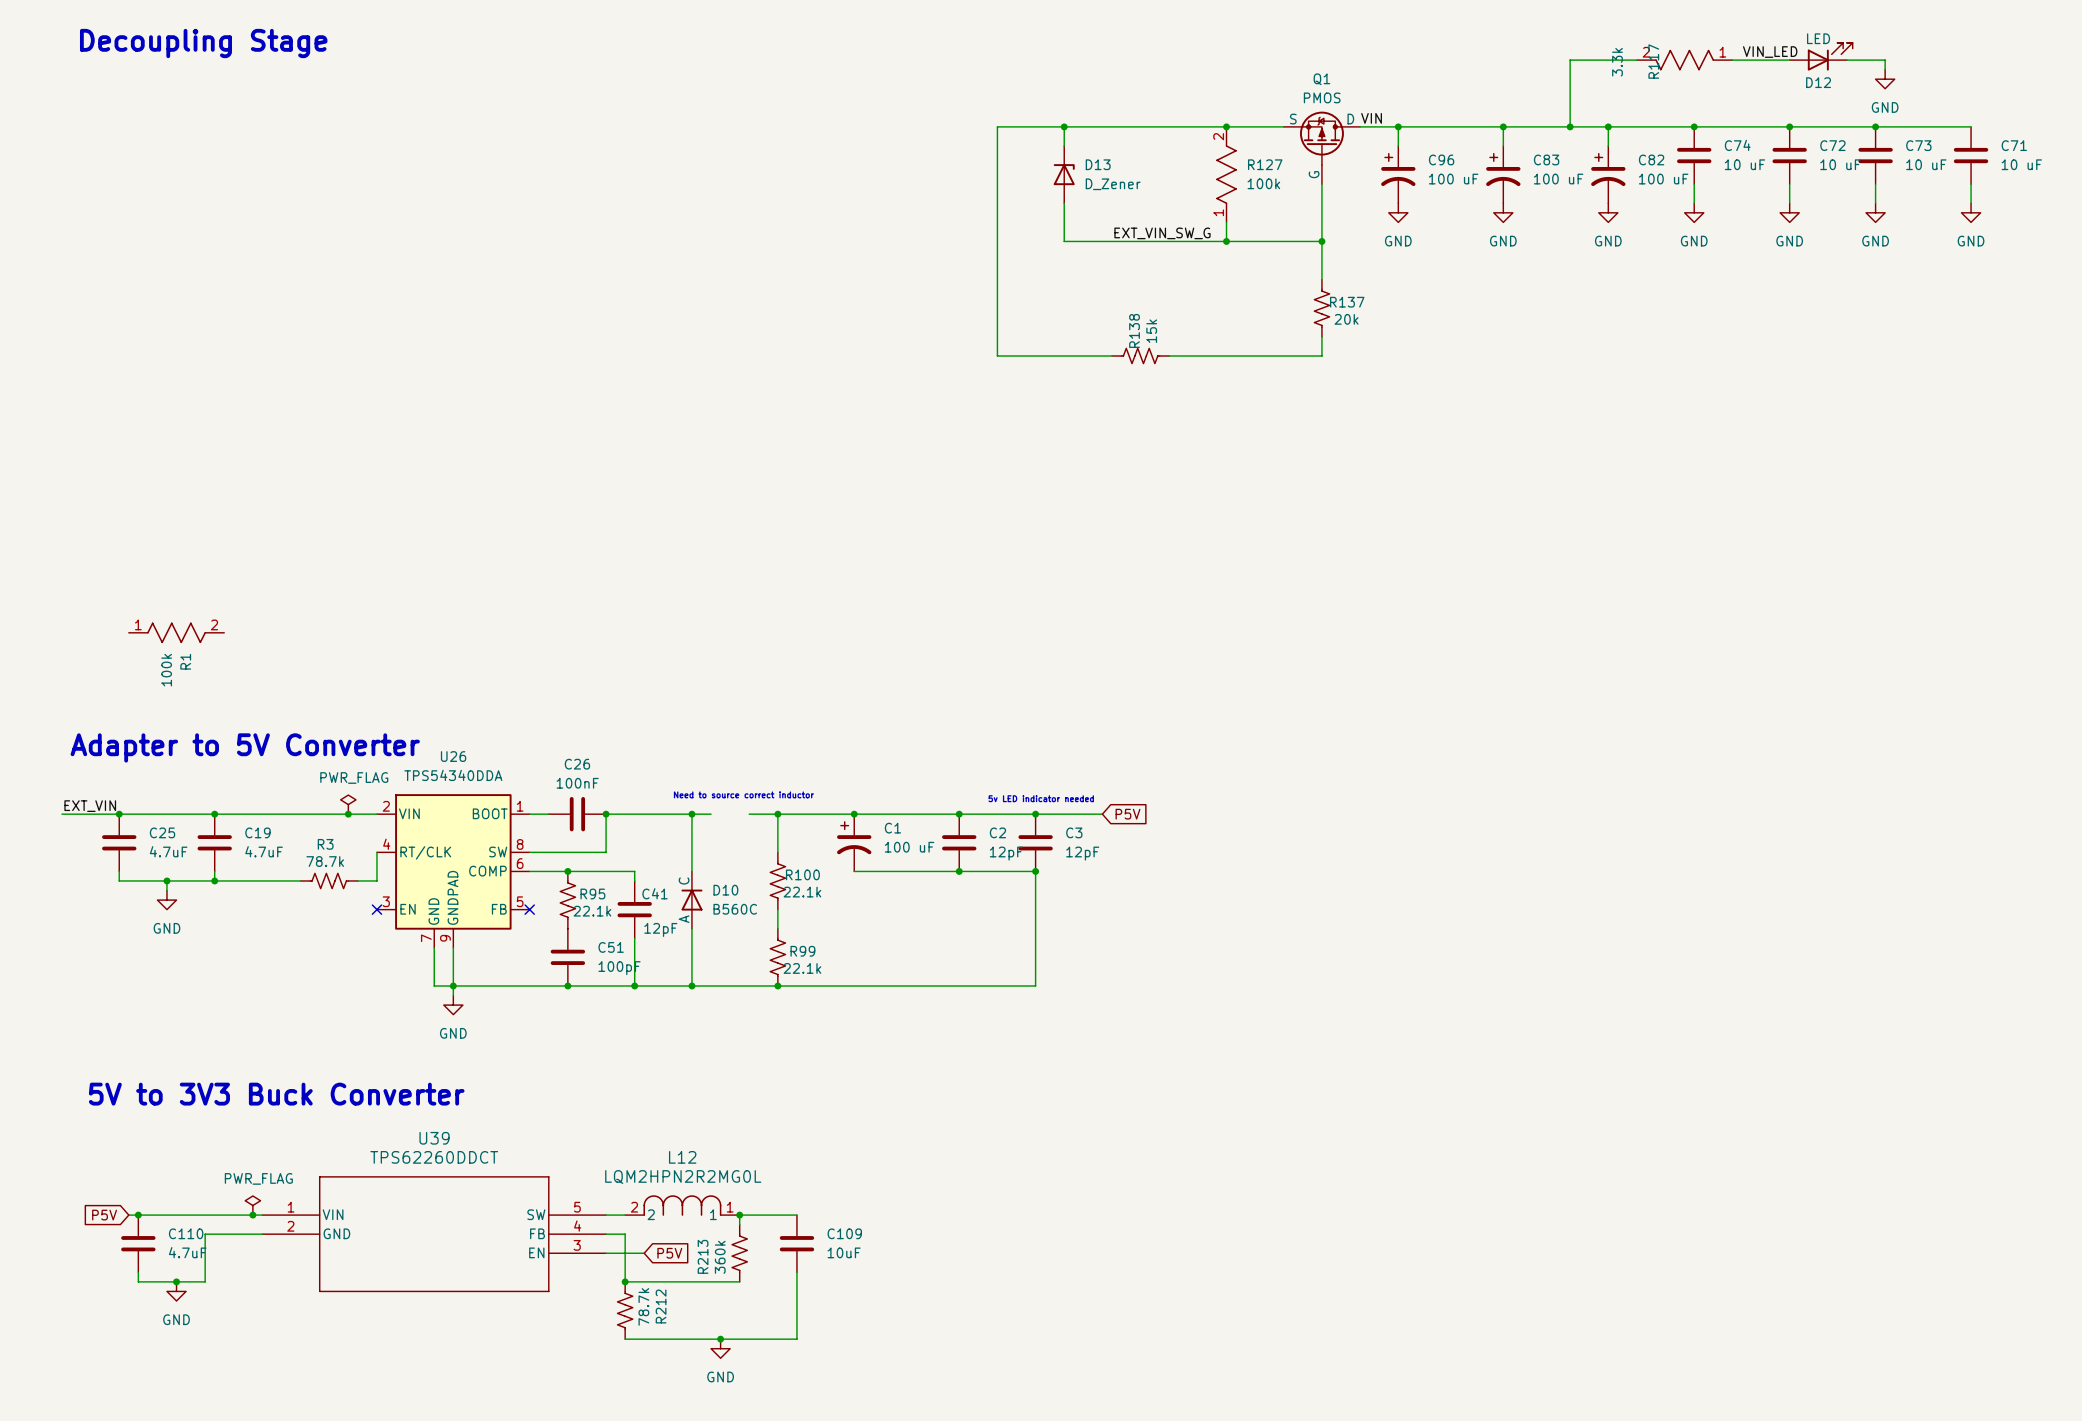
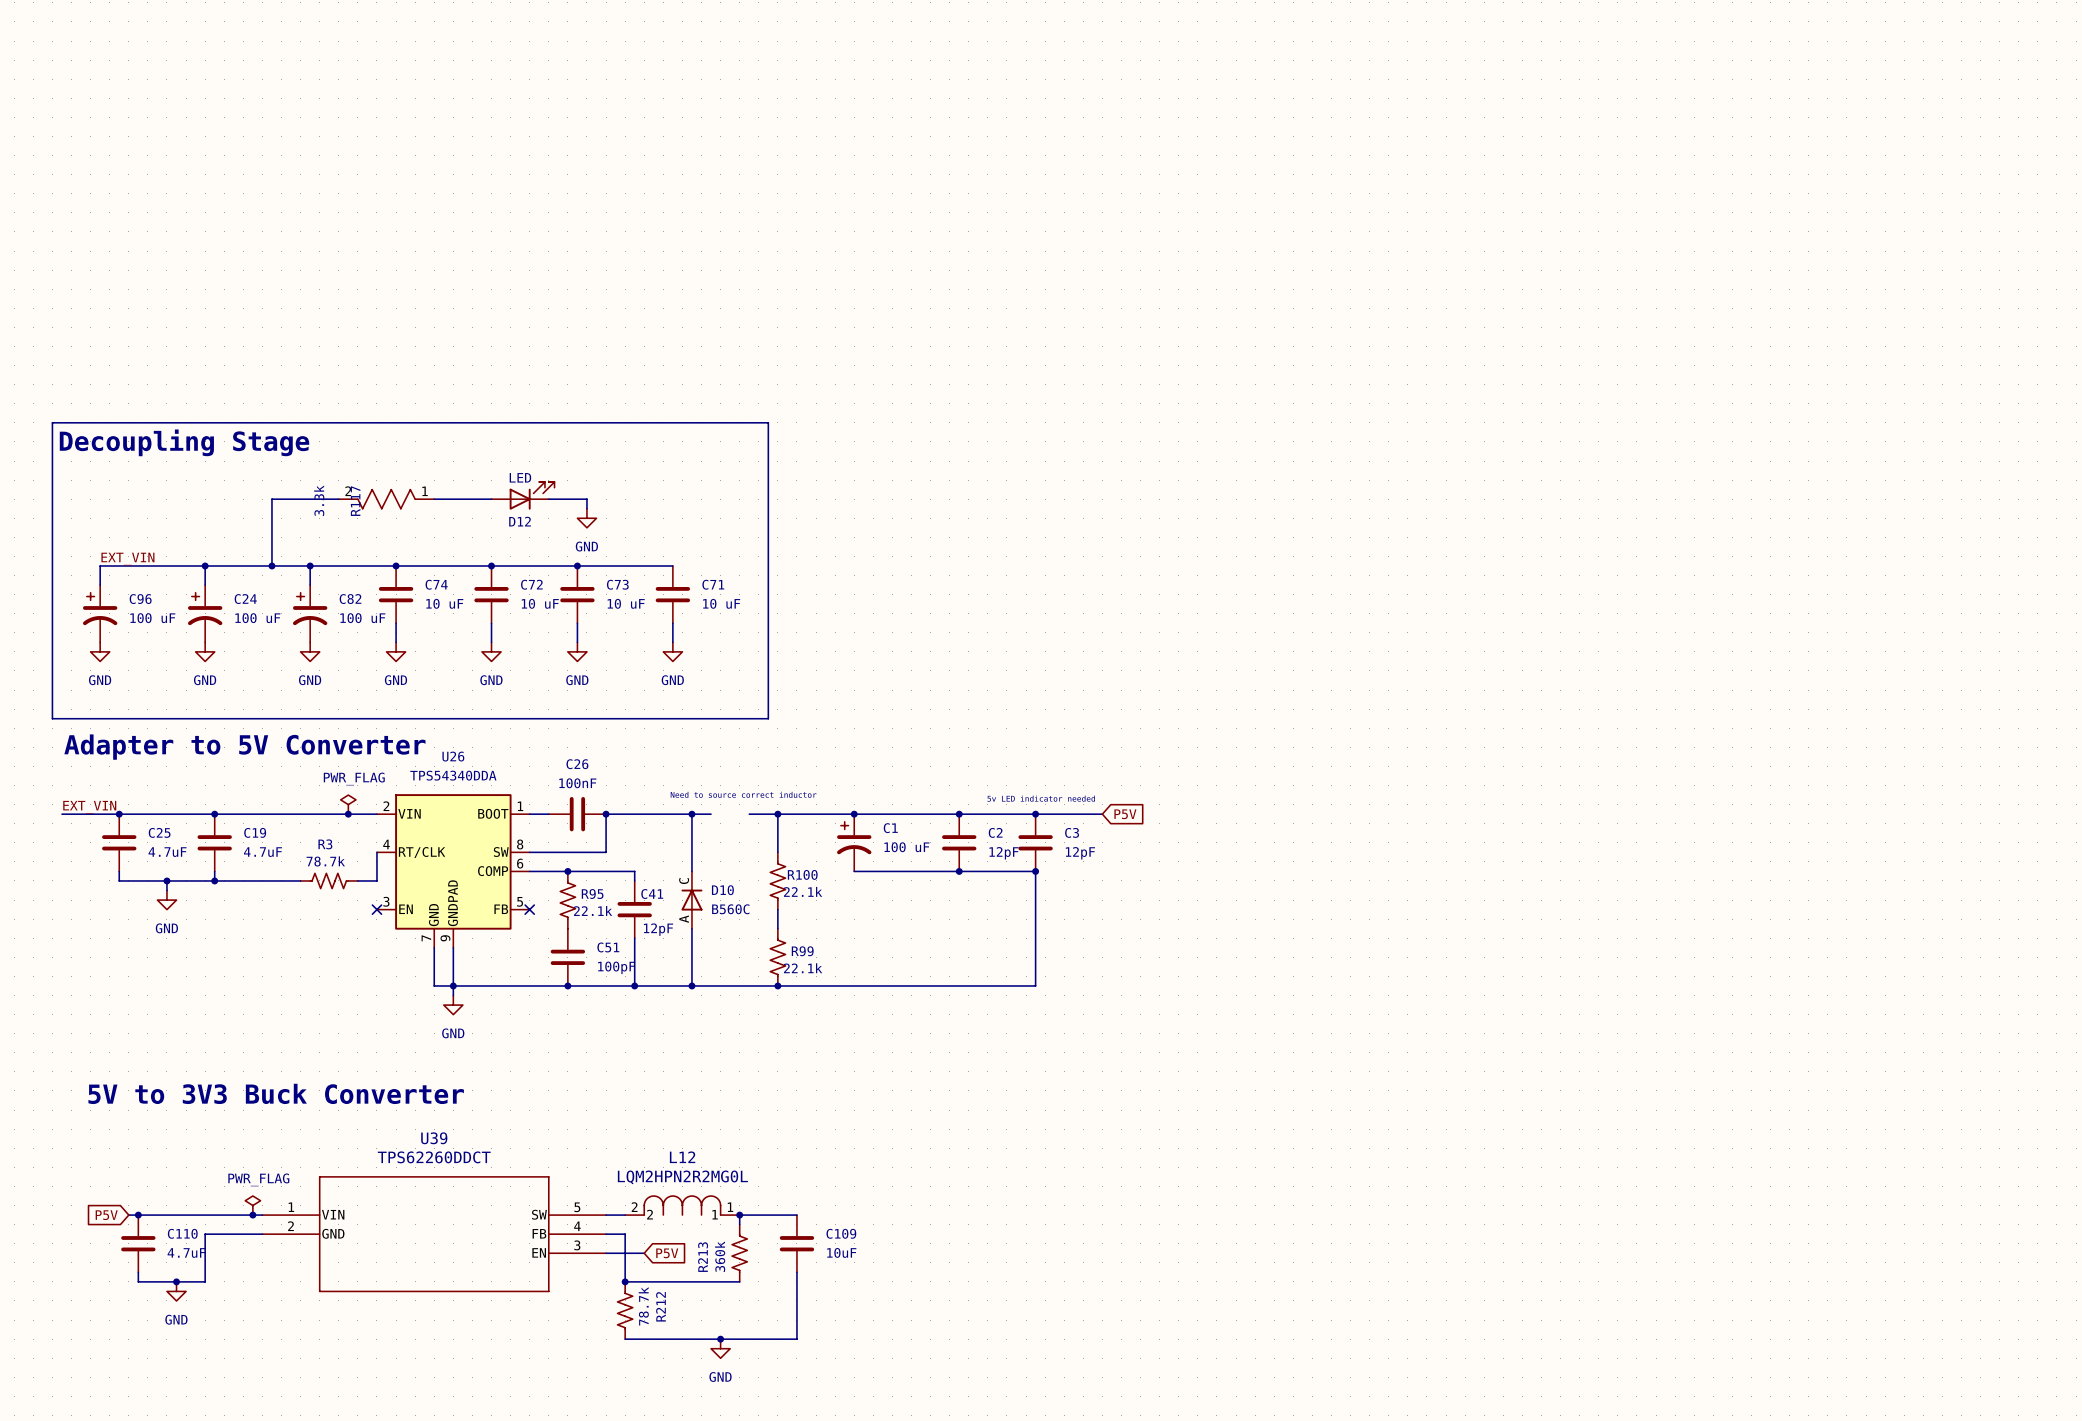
text: Decoupling Stage (203, 43) -> none
label: VIN_LED (1770, 52) -> none
D12 position: (1821, 56) -> (523, 495)
wire: (1636, 60) (1570, 60) (1570, 126) -> none
R117 position: (1684, 60) -> (386, 499)
wire: (1732, 60) (1789, 60) -> none
wire: (1846, 60) (1885, 60) (1885, 69) -> none
power symbol: GND (1885, 79) -> none
label: VIN (1371, 118) -> none
wire: (1064, 126) (1064, 146) -> none
junction: (1064, 126) -> none
junction: (1226, 126) -> none
wire: (1283, 126) (997, 126) (997, 356) (1111, 356) -> none
wire: (1360, 126) (1971, 126) -> none
wire: (1398, 126) (1398, 146) -> none
junction: (1398, 126) -> none
wire: (1503, 126) (1503, 146) -> none
junction: (1503, 126) -> none
junction: (1570, 126) -> none
wire: (1608, 126) (1608, 146) -> none
junction: (1608, 126) -> none
junction: (1694, 126) -> none
junction: (1789, 126) -> none
junction: (1875, 126) -> none
Q1: PMOS (1321, 147) -> none
C74 position: (1694, 155) -> (396, 594)
C72 position: (1789, 155) -> (491, 594)
C73 position: (1875, 155) -> (577, 594)
C71 position: (1971, 155) -> (672, 594)
D13: D_Zener (1064, 174) -> none
R127: 100k (1226, 174) -> none
C96 position: (1398, 174) -> (100, 613)
C83: 100 uF (1503, 174) -> none
C82 position: (1608, 174) -> (310, 613)
wire: (1321, 184) (1321, 279) -> none
wire: (1694, 184) (1694, 203) -> none
wire: (1789, 184) (1789, 203) -> none
wire: (1875, 184) (1875, 203) -> none
wire: (1971, 184) (1971, 203) -> none
wire: (1064, 203) (1064, 241) (1321, 241) -> none
power symbol: GND (1398, 212) -> none
power symbol: GND (1503, 212) -> none
power symbol: GND (1608, 212) -> none
power symbol: GND (1694, 212) -> none
power symbol: GND (1789, 212) -> none
power symbol: GND (1875, 212) -> none
power symbol: GND (1971, 212) -> none
wire: (1226, 222) (1226, 241) -> none
label: EXT_VIN_SW_G (1162, 233) -> none
junction: (1226, 241) -> none
junction: (1321, 241) -> none
R137: 20k (1321, 308) -> none
wire: (1321, 336) (1321, 356) (1169, 356) -> none
R138: 15k (1140, 356) -> none
line: none -> (52, 422) (768, 422) (768, 718) (52, 718) (52, 422)
text: none -> Decoupling Stage (184, 442)
wire: none -> (338, 499) (271, 499) (271, 565)
wire: none -> (434, 499) (491, 499)
wire: none -> (548, 499) (586, 499) (586, 508)
power symbol: none -> GND (586, 518)
label: none -> EXT_VIN (127, 559)
wire: none -> (205, 565) (205, 585)
junction: none -> (205, 565)
junction: none -> (271, 565)
wire: none -> (310, 565) (310, 585)
junction: none -> (310, 565)
junction: none -> (396, 565)
junction: none -> (491, 565)
junction: none -> (577, 565)
wire: none -> (672, 565) (100, 565) (100, 585)
C24: none -> 100 uF (205, 613)
wire: none -> (396, 623) (396, 642)
wire: none -> (491, 623) (491, 642)
wire: none -> (577, 623) (577, 642)
wire: none -> (672, 623) (672, 642)
R1: 100k (176, 632) -> none
power symbol: none -> GND (100, 651)
power symbol: none -> GND (205, 651)
power symbol: none -> GND (310, 651)
power symbol: none -> GND (396, 651)
power symbol: none -> GND (491, 651)
power symbol: none -> GND (577, 651)
power symbol: none -> GND (672, 651)

